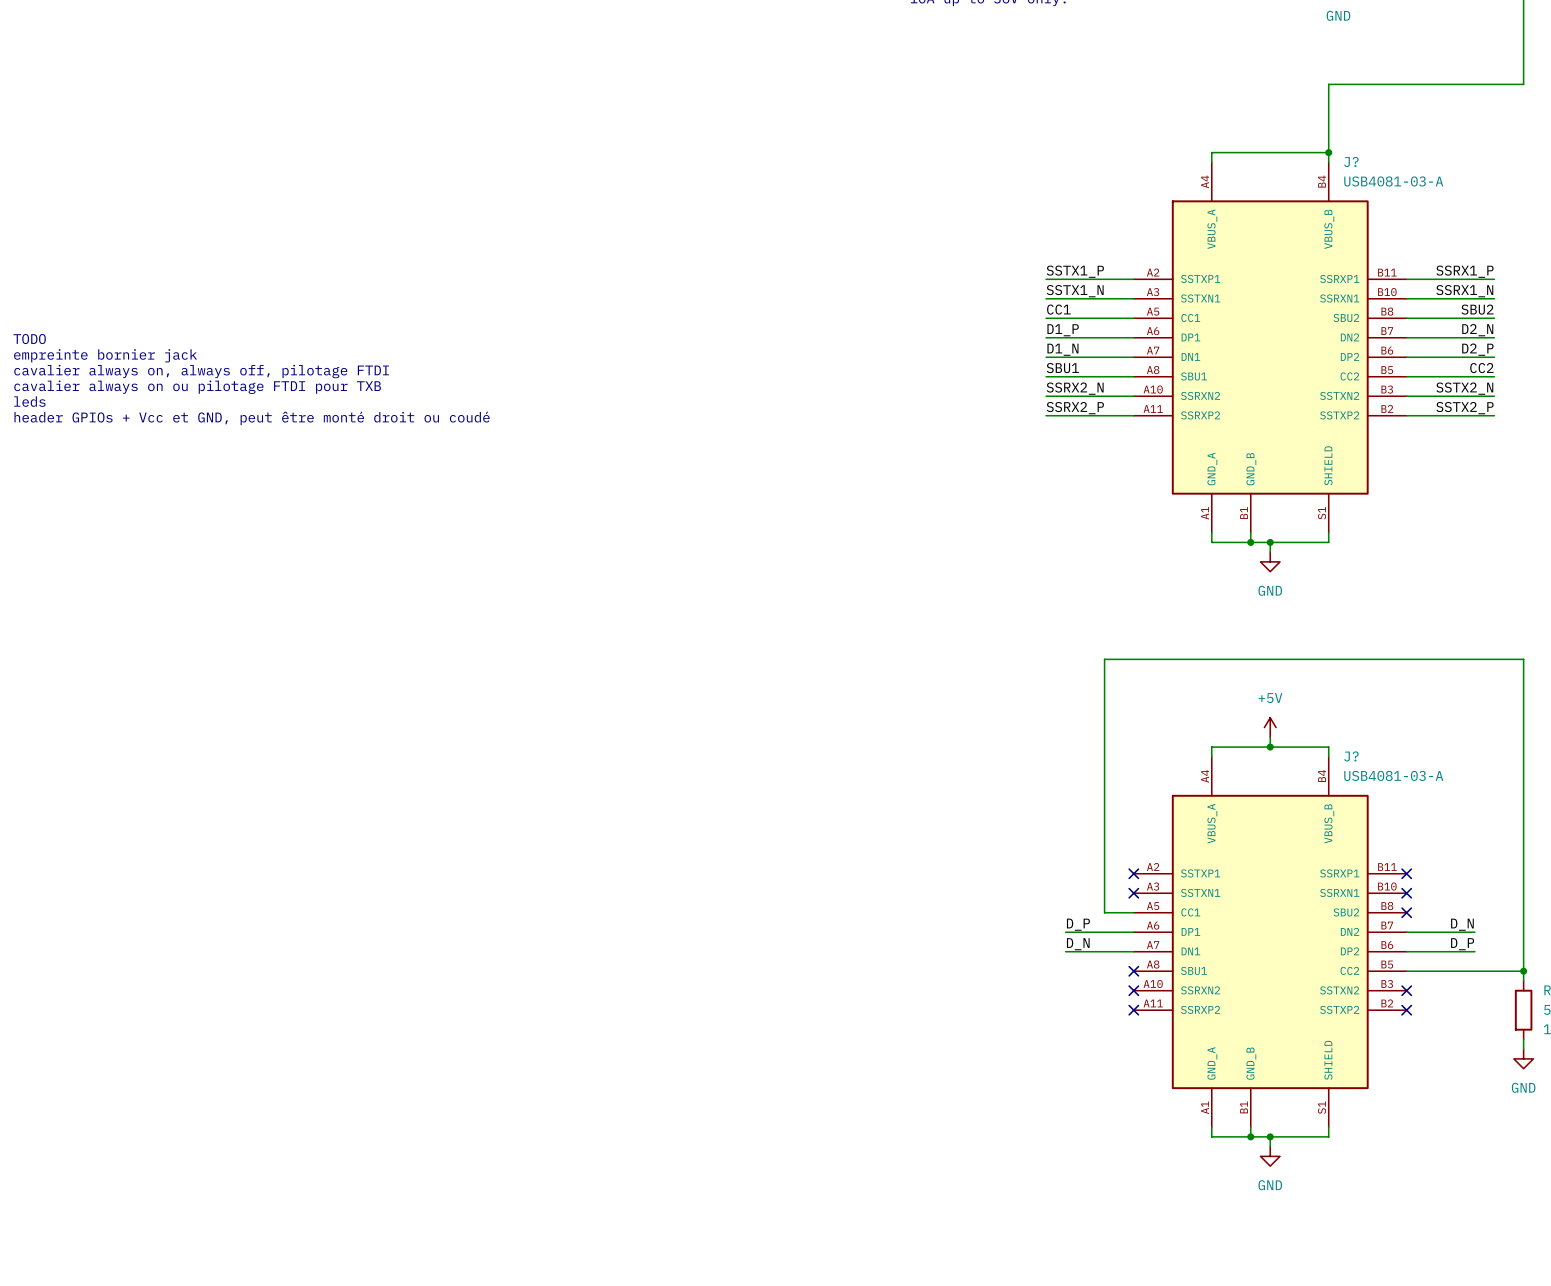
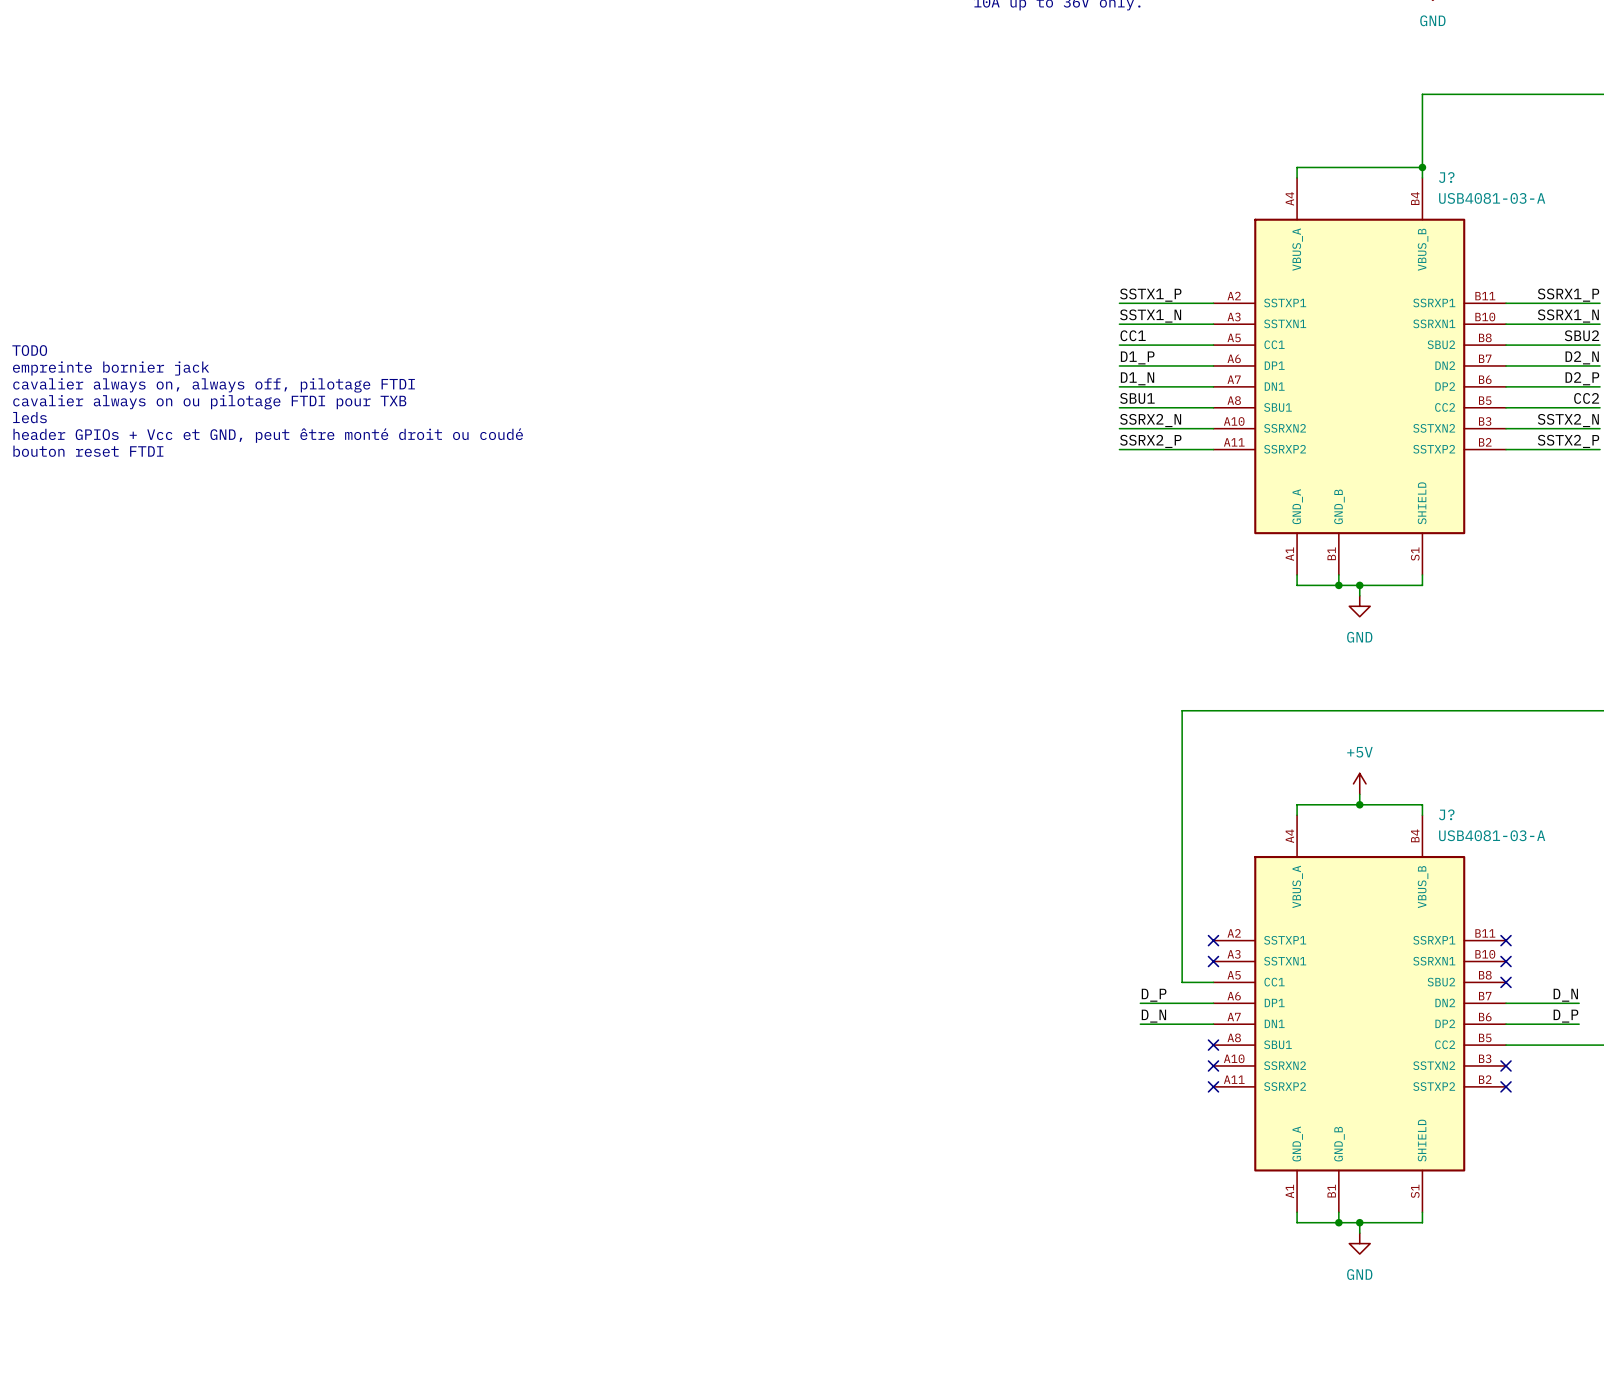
text: none -> TODO (29, 350)
text: TODO (29, 339) -> empreinte bornier jack (111, 368)
text: empreinte bornier jack (105, 355) -> cavalier always on, always off, pilotage FTDI (214, 385)
text: cavalier always on, always off, pilotage FTDI (201, 371) -> cavalier always on ou pilotage FTDI pour TXB (209, 402)
text: cavalier always on ou pilotage FTDI pour TXB (197, 387) -> leds (29, 417)
text: leds (29, 401) -> header GPIOs + Vcc et GND, peut être monté droit ou coudé (268, 435)
text: header GPIOs + Vcc et GND, peut être monté droit ou coudé (252, 418) -> bouton reset FTDI (88, 451)

